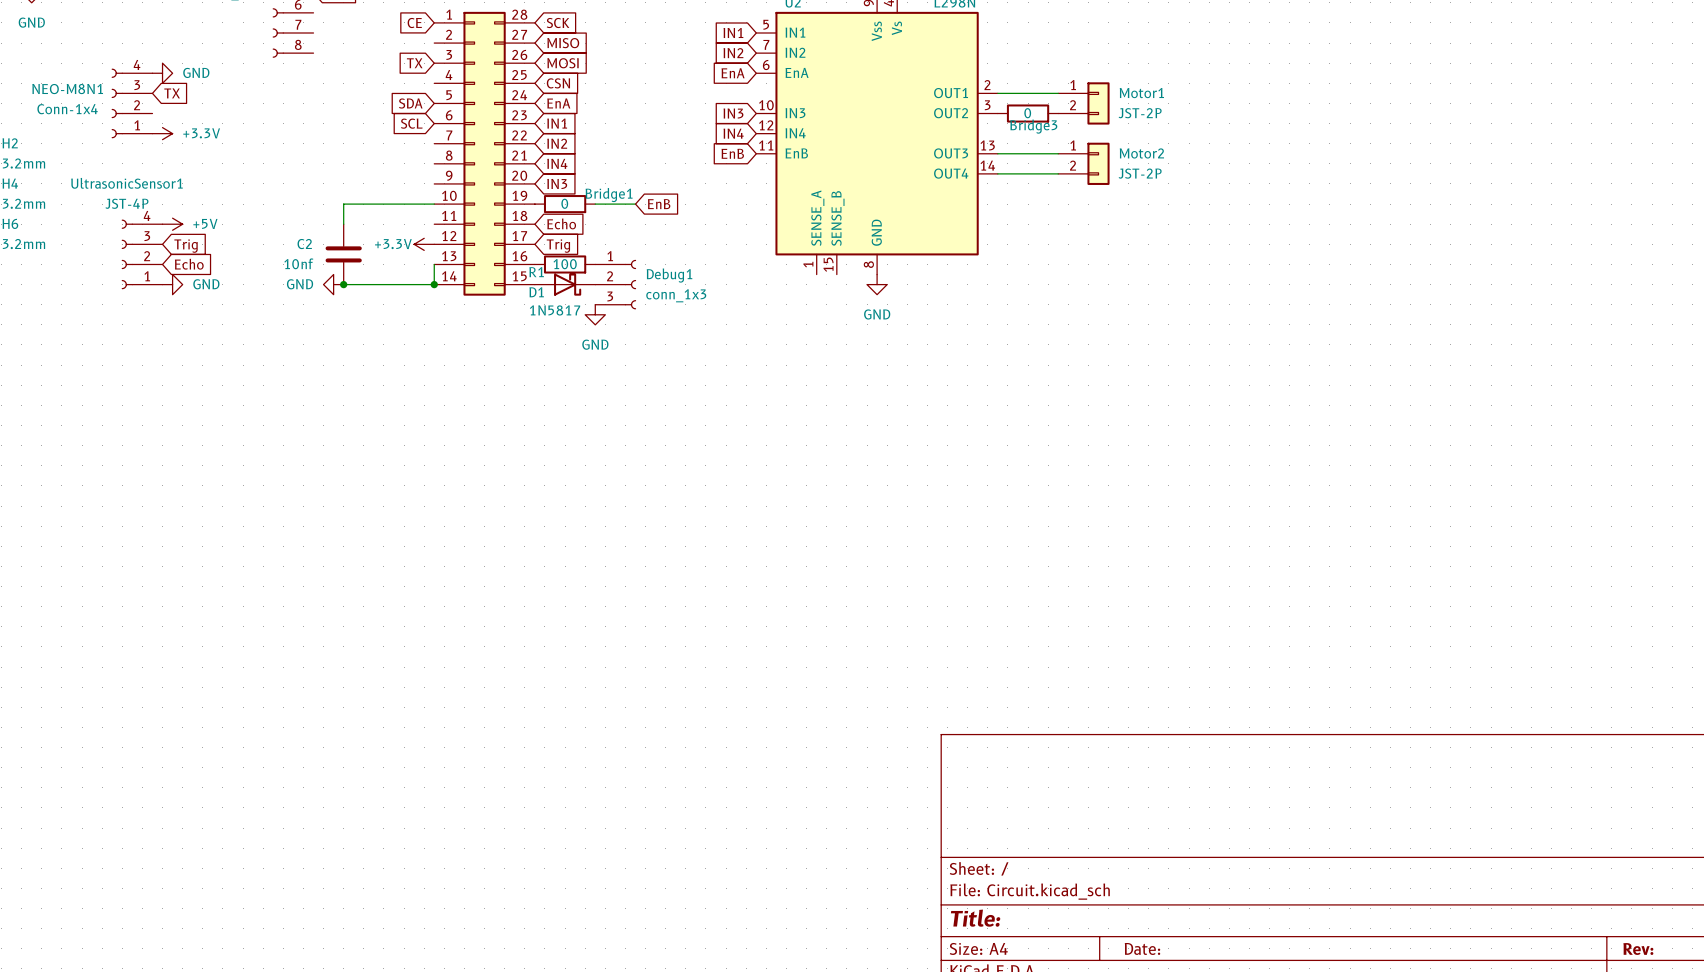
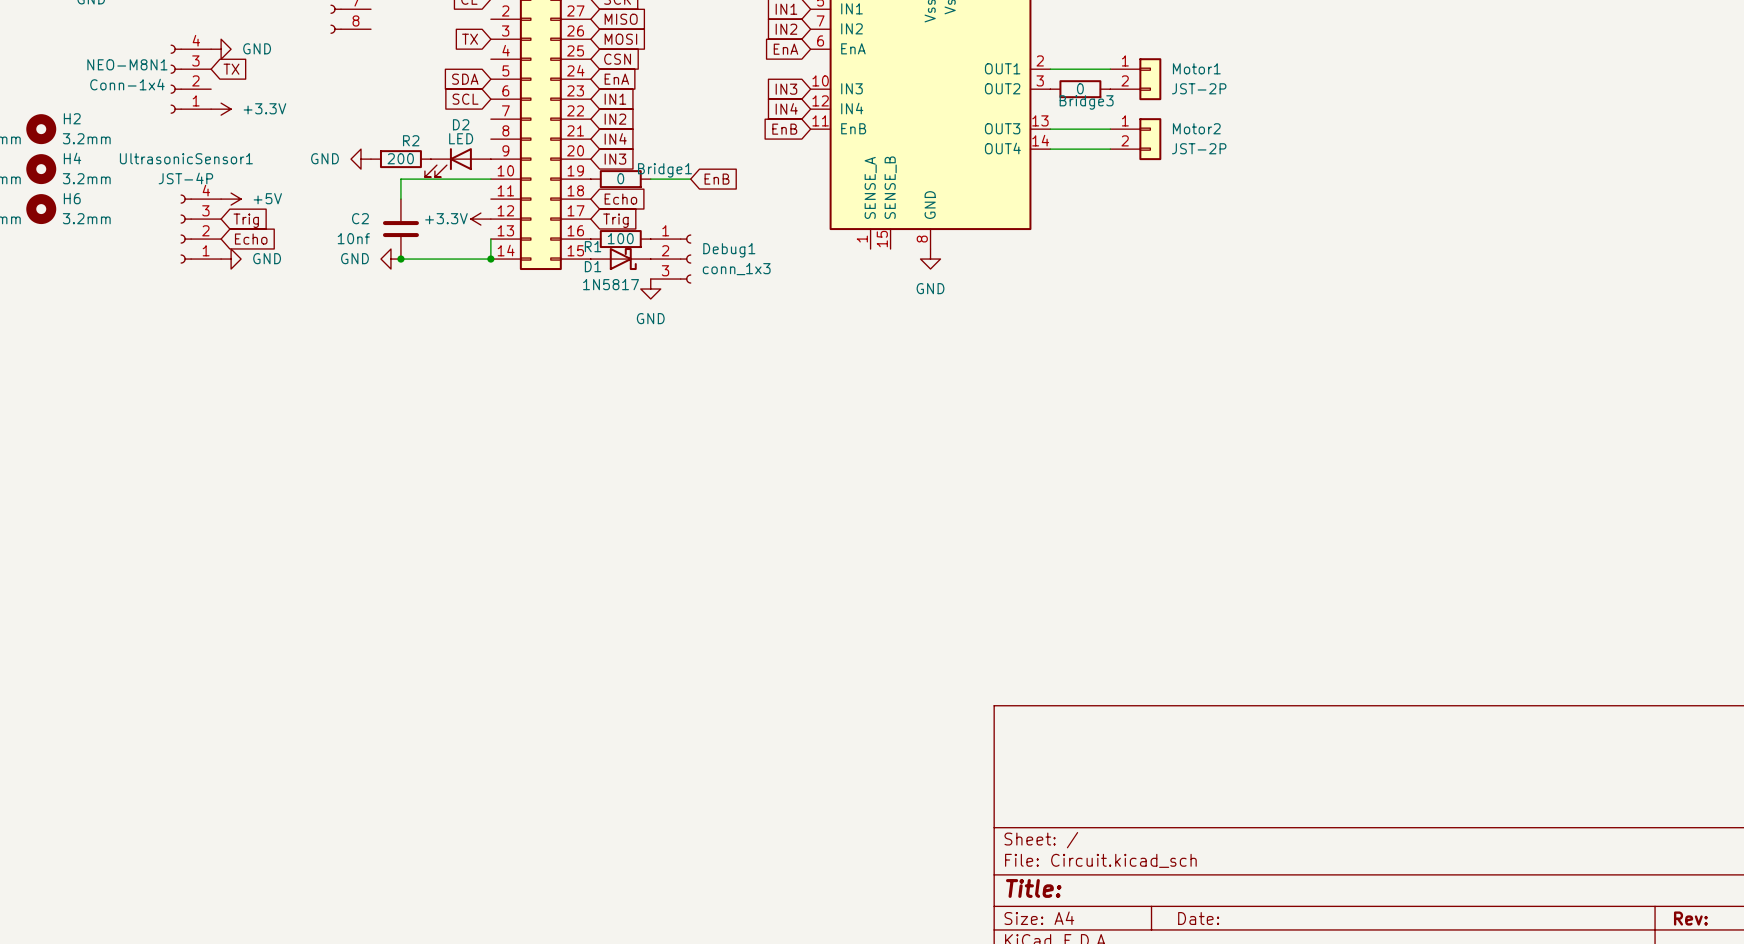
power symbol: none -> GND (360, 159)
R2: none -> 200 (400, 159)
D2: none -> LED (457, 162)

